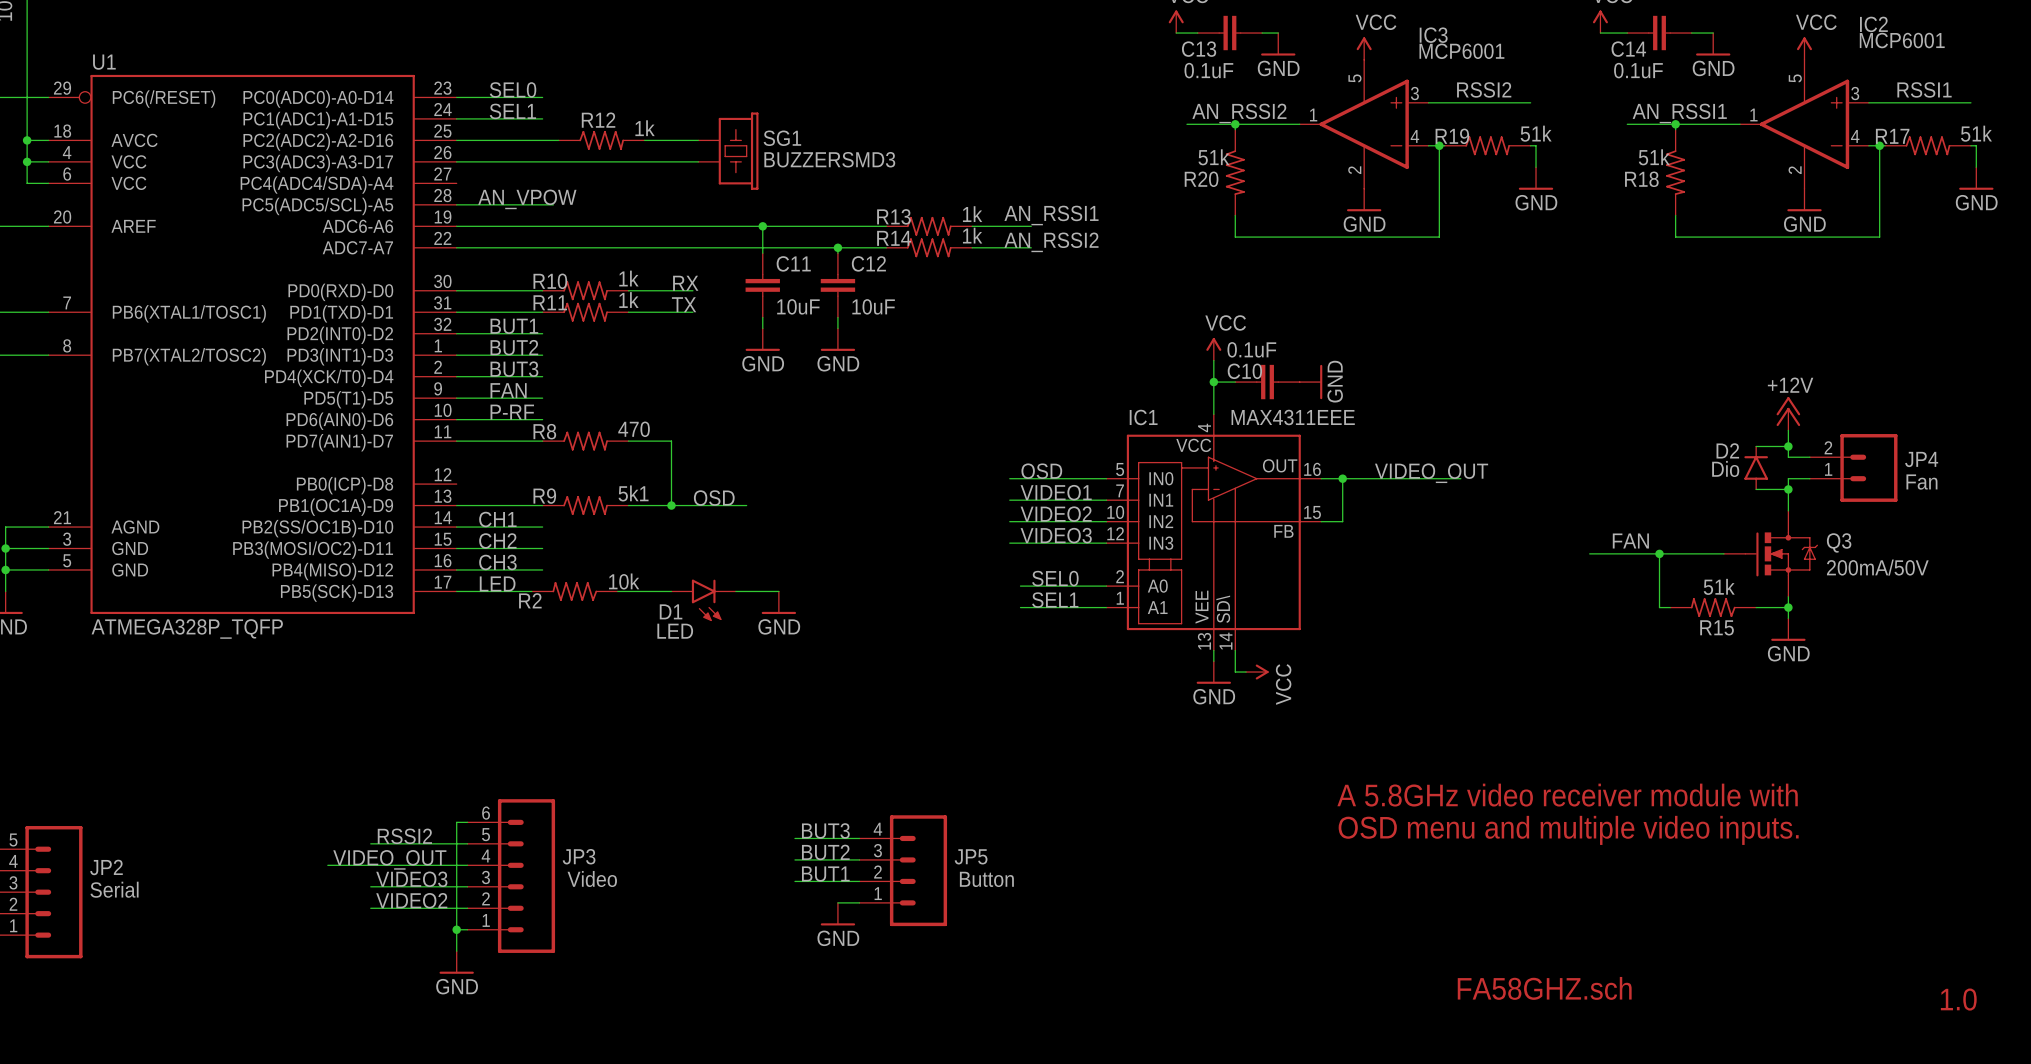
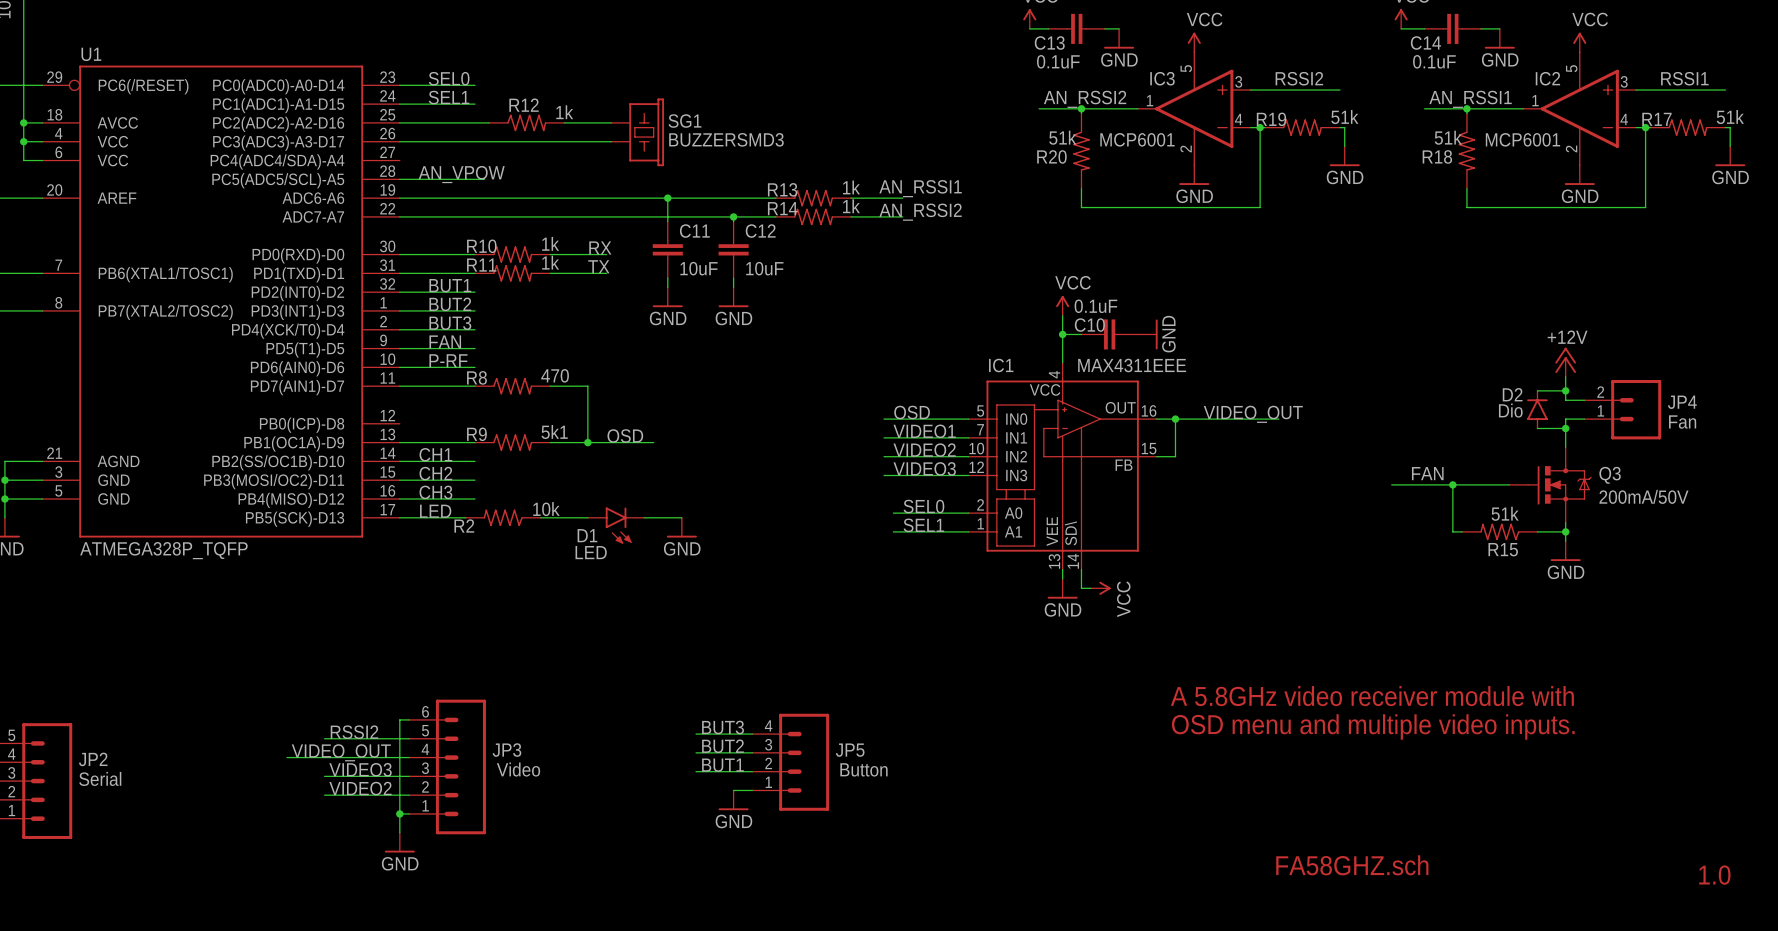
IC2 name position: IC2 (1873, 24) -> IC2 (1547, 78)
IC3 name position: IC3 (1433, 35) -> IC3 (1162, 78)
IC2 value position: MCP6001 (1902, 40) -> MCP6001 (1522, 139)
IC3 value position: MCP6001 (1461, 51) -> MCP6001 (1137, 139)

